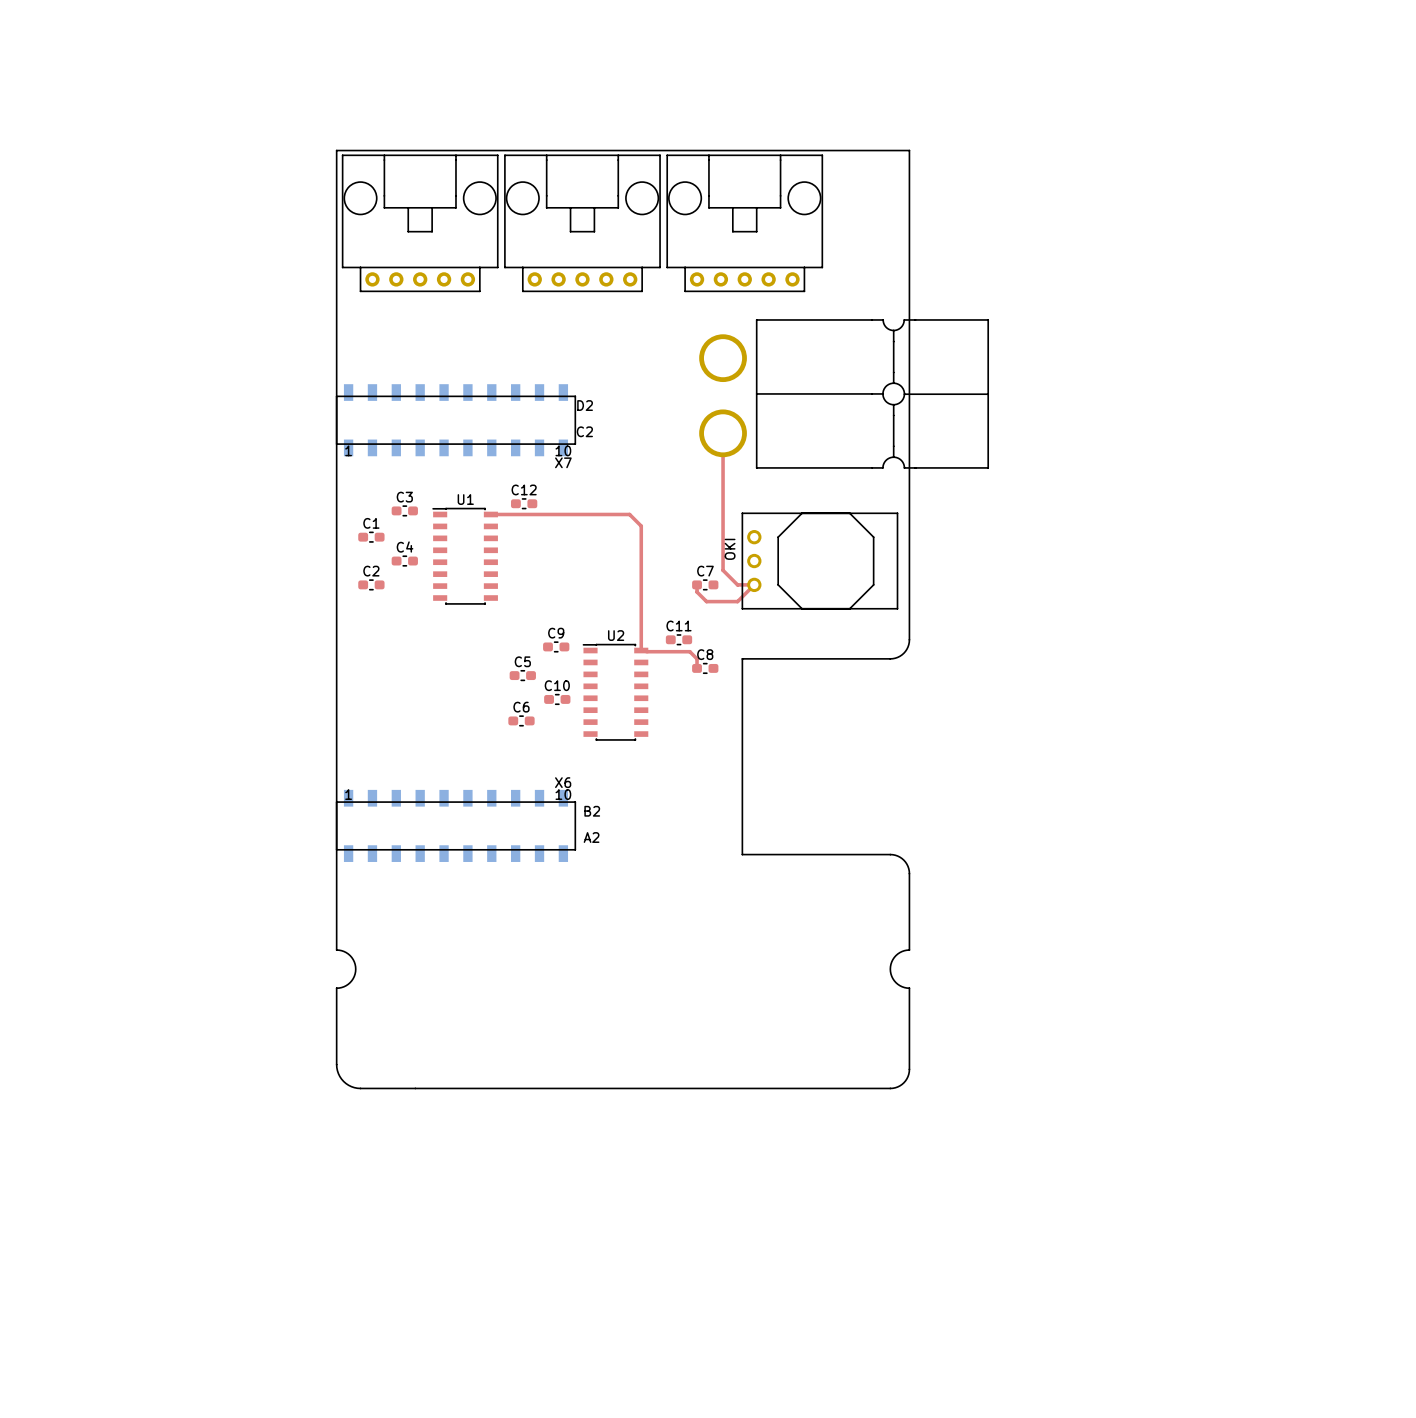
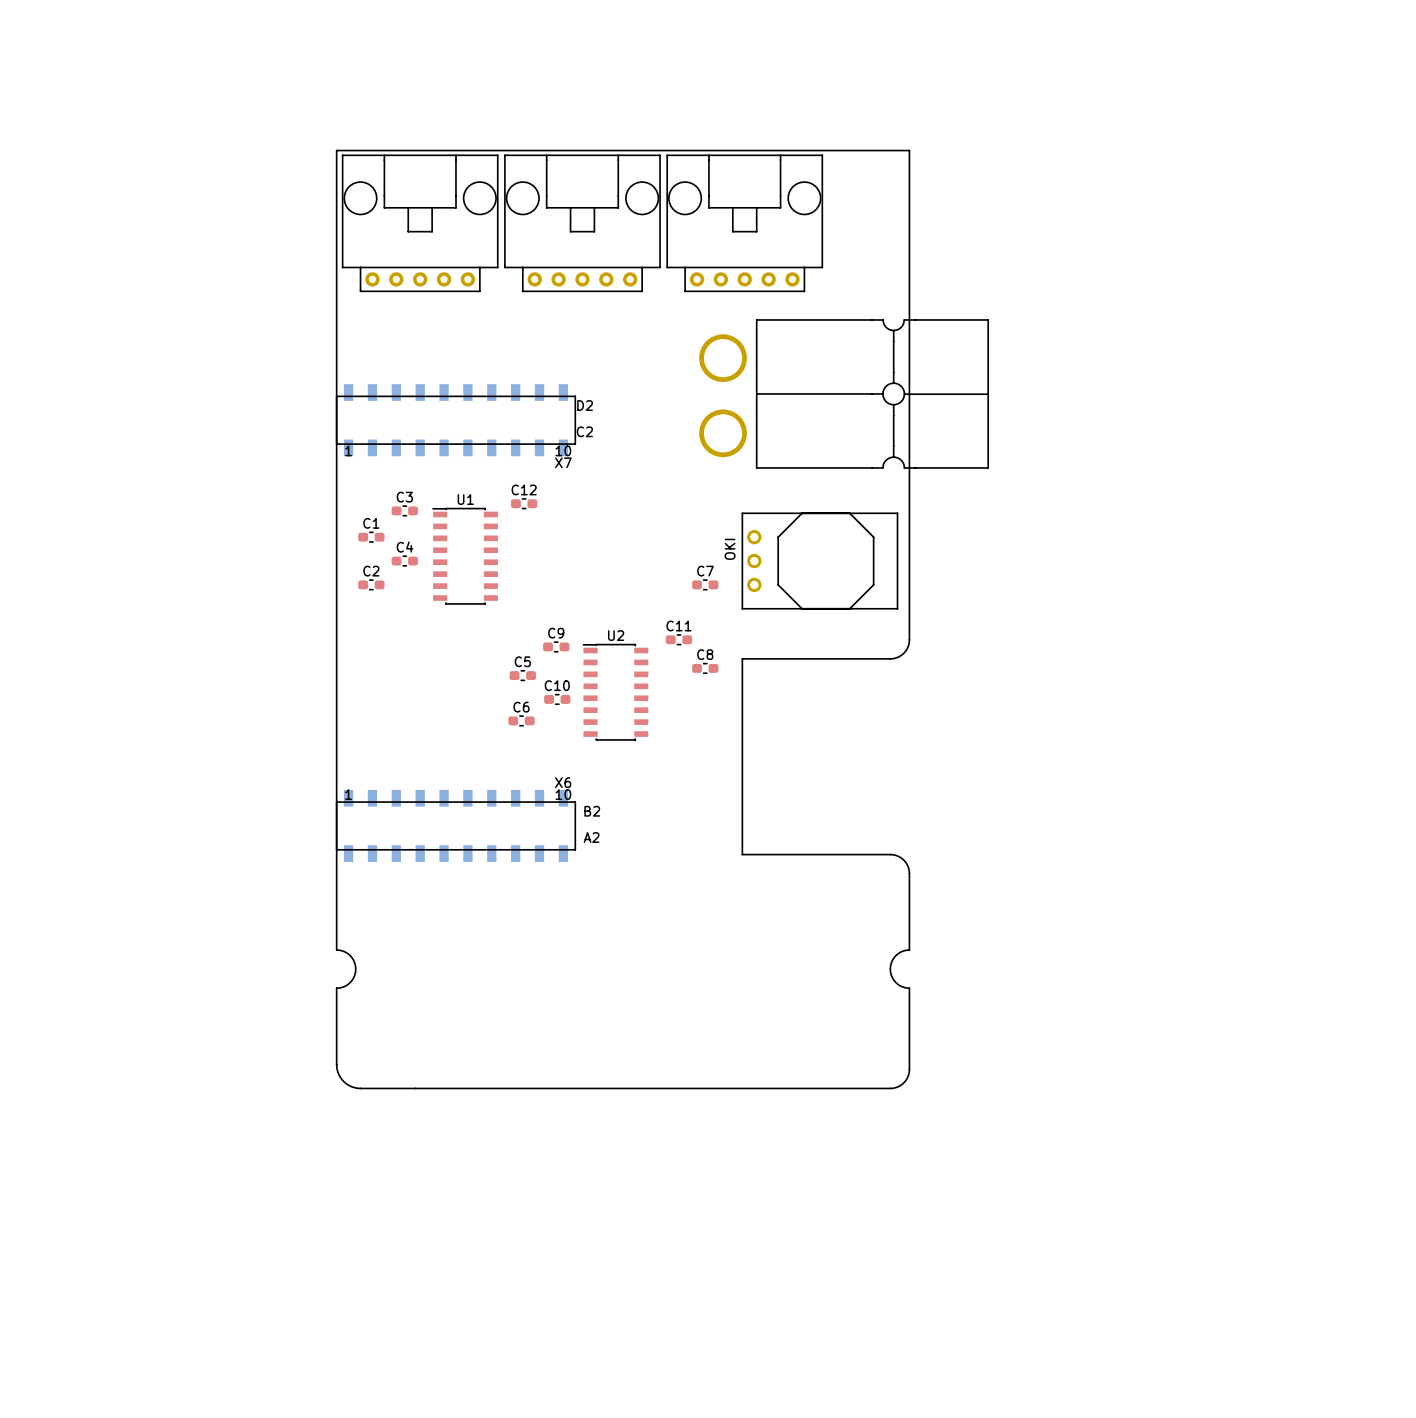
top track: (723, 433) (723, 570) (737, 584) (754, 584) (737, 601) (706, 601) (697, 592) (697, 584) -> none
top track: (490, 514) (629, 514) (641, 526) (641, 650) (689, 651) (697, 658) (697, 668) -> none

